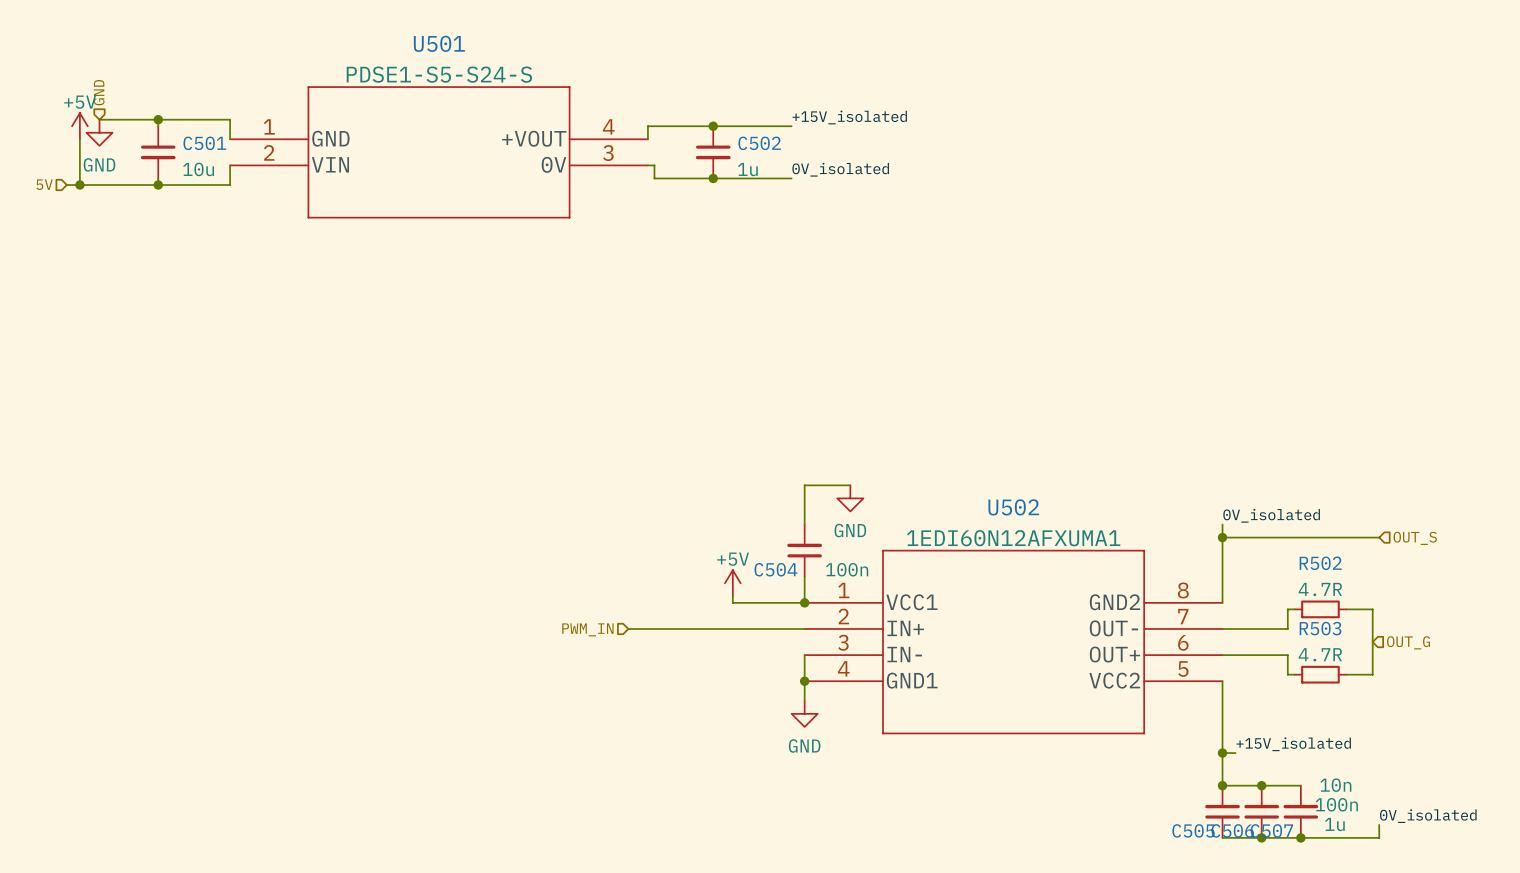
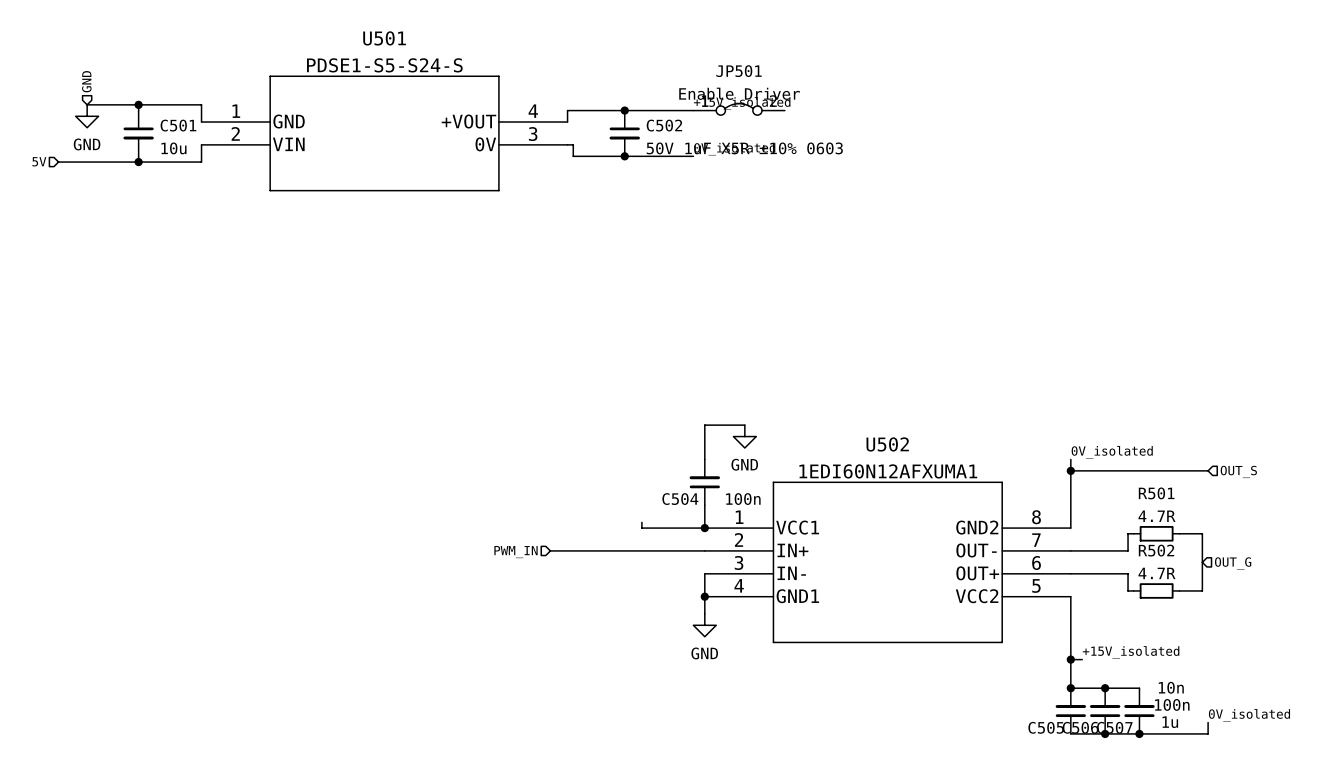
JP501: none -> Enable_Driver (739, 109)
power symbol: +5V (79, 126) -> none
wire: (79, 139) (79, 185) -> none
C502 value: 1u (747, 169) -> 50V 1uF X5R ±10% 0603 (744, 148)
junction: (79, 185) -> none
R502 name: R502 (1320, 563) -> R501 (1156, 493)
power symbol: +5V (732, 583) -> none
R503 name: R503 (1320, 628) -> R502 (1156, 550)

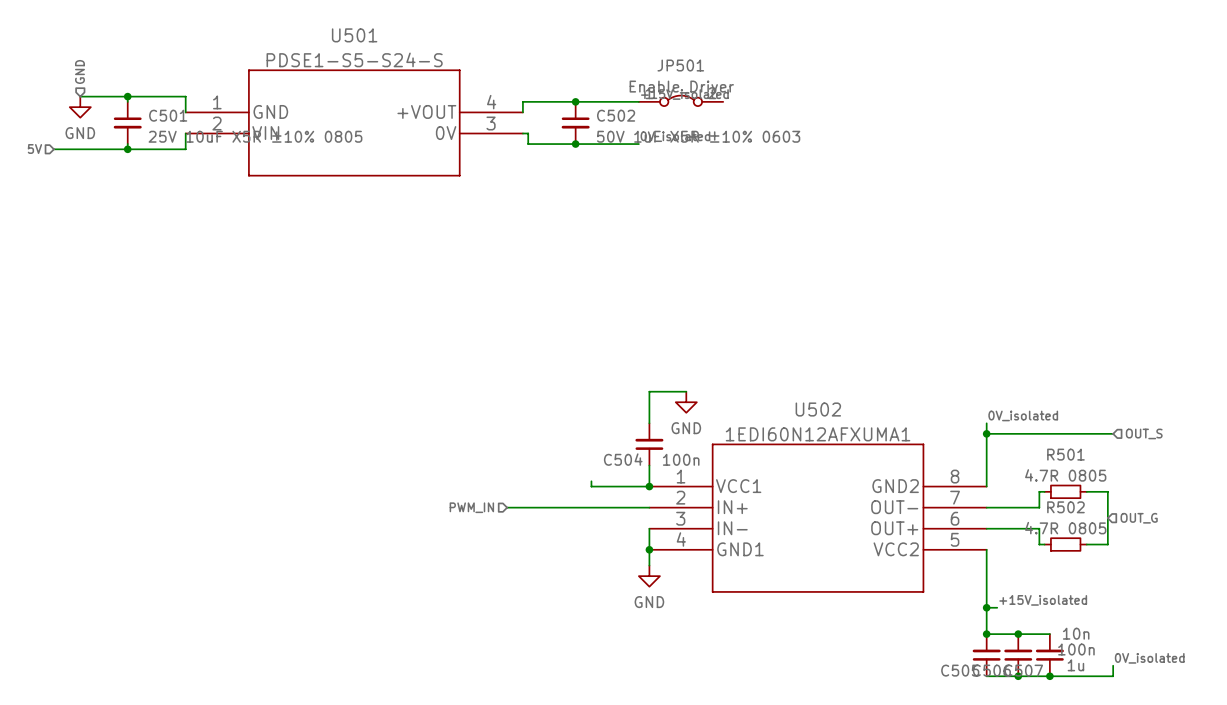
C501 value: 10u (173, 148) -> 25V 10uF X5R ±10% 0805 (255, 136)
R501 value: 4.7R (1157, 516) -> 4.7R 0805 (1065, 475)
R502 value: 4.7R (1157, 573) -> 4.7R 0805 (1065, 528)

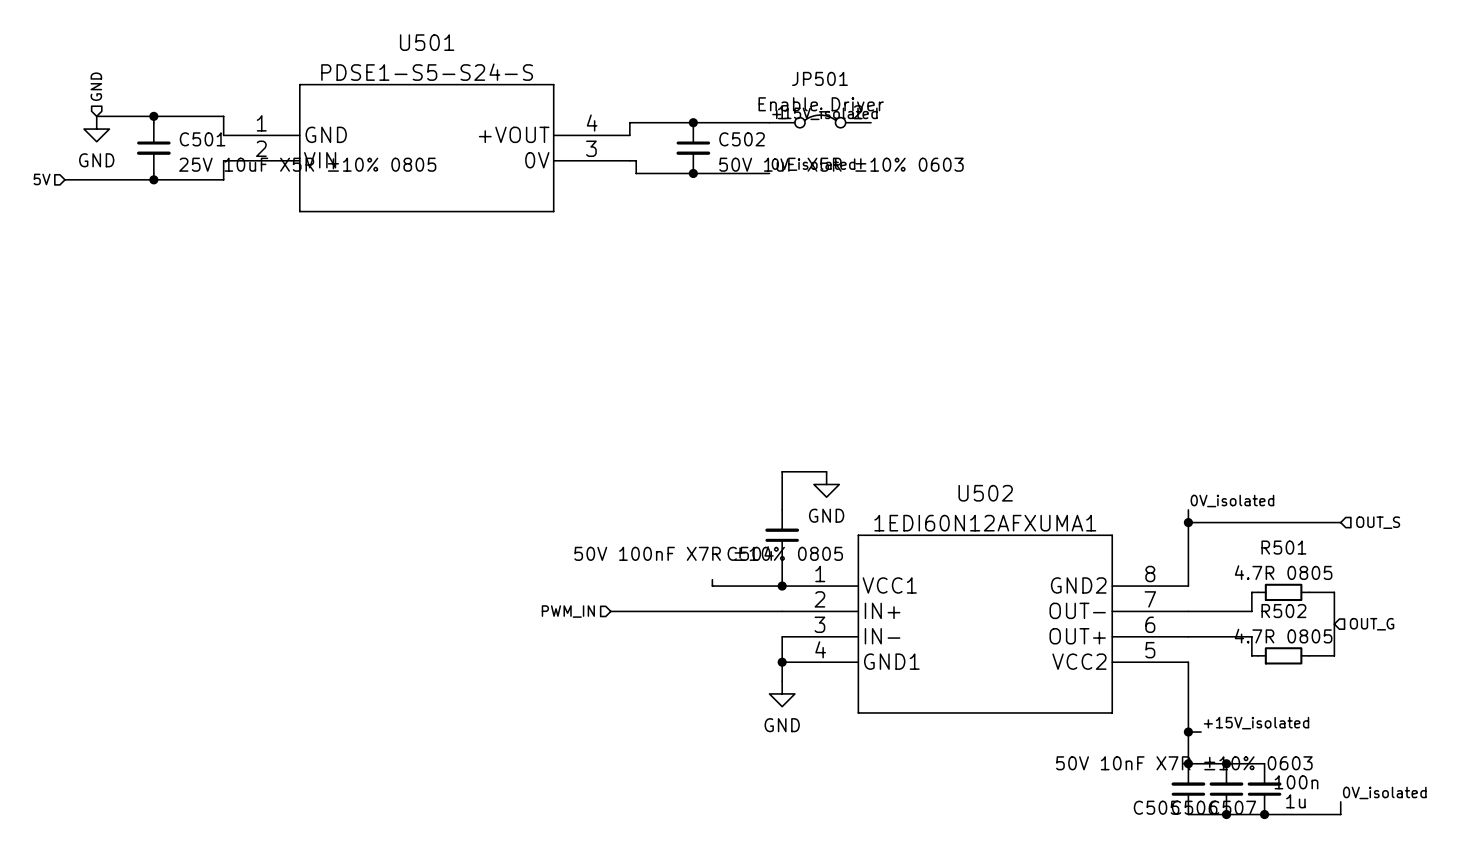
C504 value: 100n (681, 459) -> 50V 100nF X7R ±10% 0805 (708, 553)
C505 value: 10n (1076, 633) -> 50V 10nF X7R ±10% 0603 (1184, 763)

